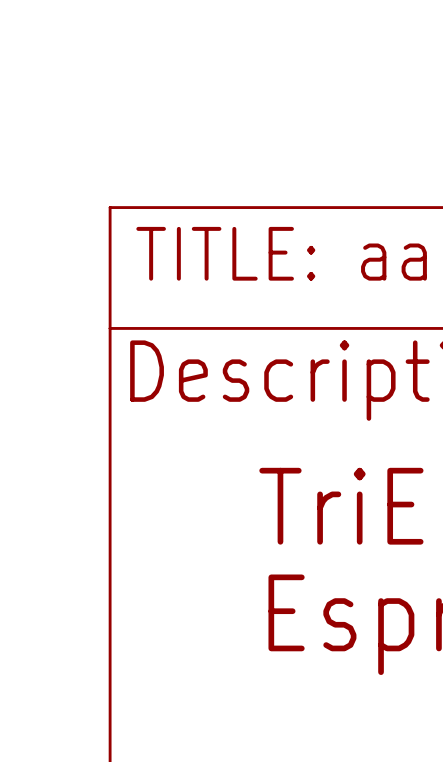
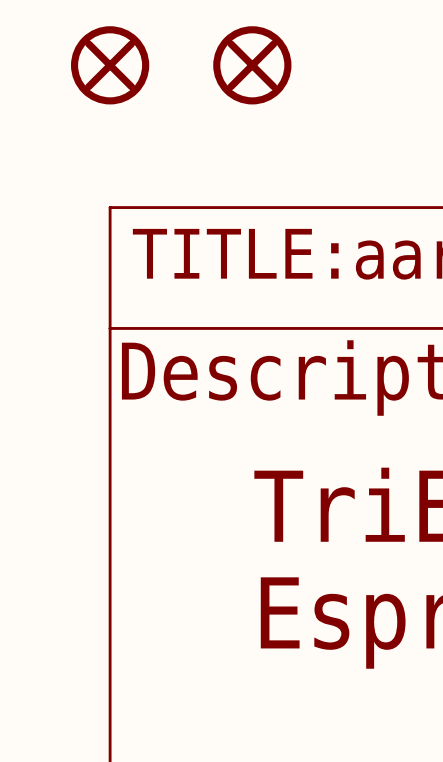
part: none -> (110, 65)
part: none -> (252, 65)

